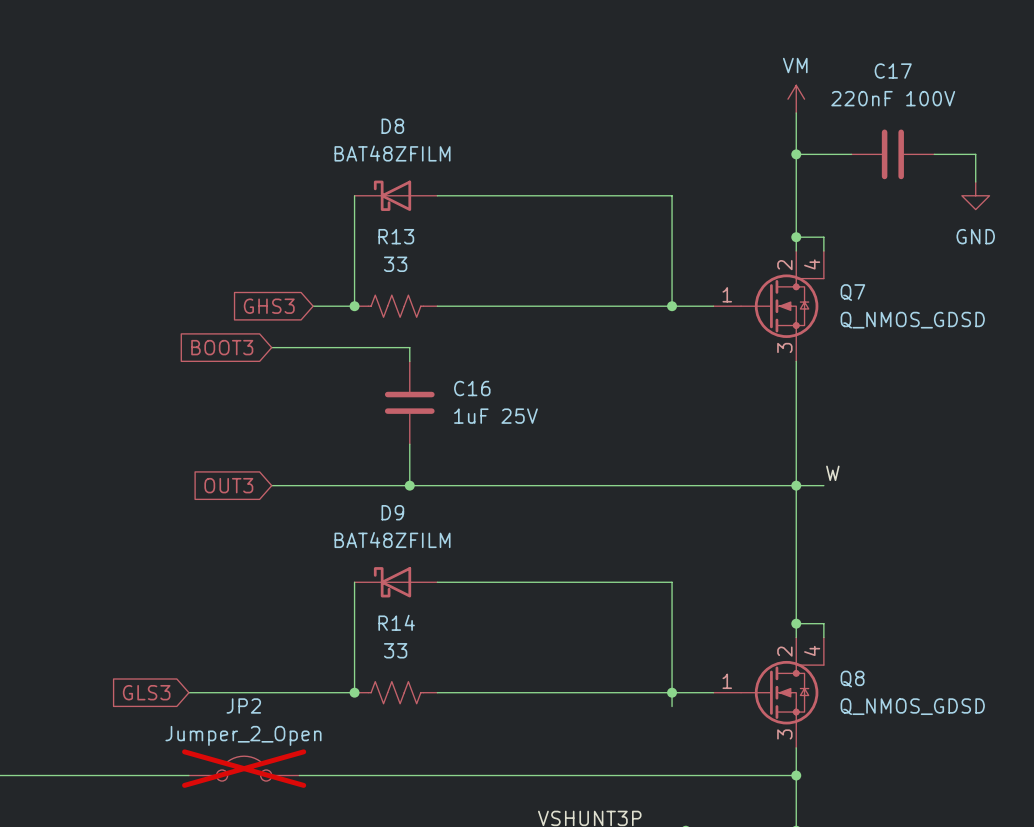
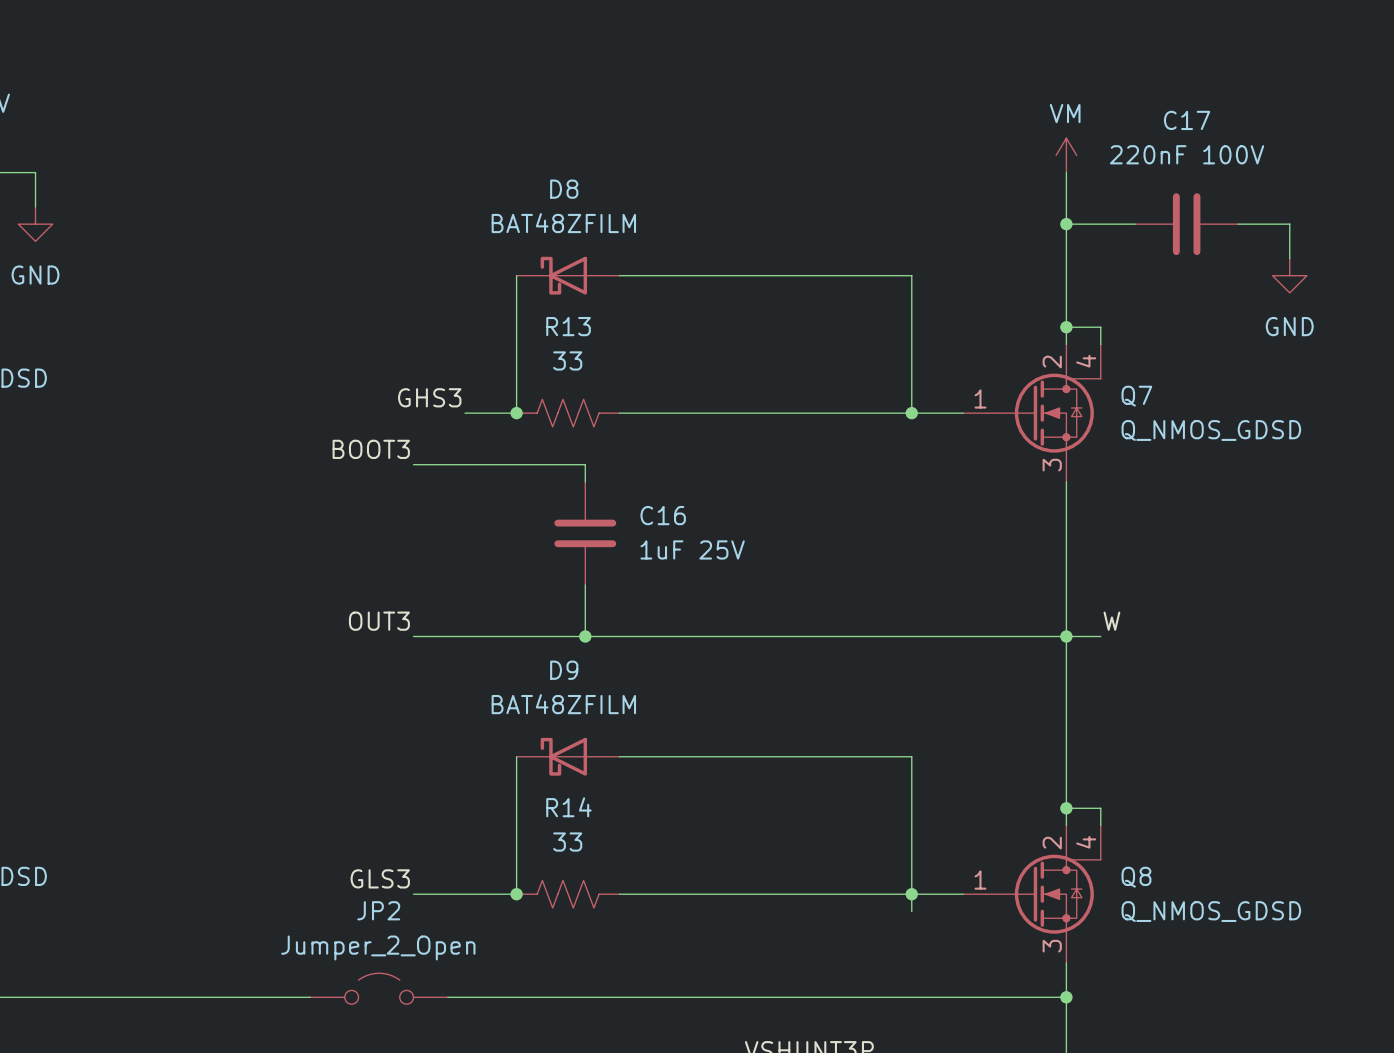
label: none -> GHS3 (429, 397)
global label: GHS3 (269, 306) -> none
label: none -> BOOT3 (371, 449)
global label: BOOT3 (222, 347) -> none
label: none -> OUT3 (379, 621)
global label: OUT3 (228, 485) -> none
label: none -> GLS3 (380, 878)
global label: GLS3 (146, 692) -> none
wire: (188, 692) (271, 692) -> none
JP2 do-not-place cross: (244, 768) -> none

